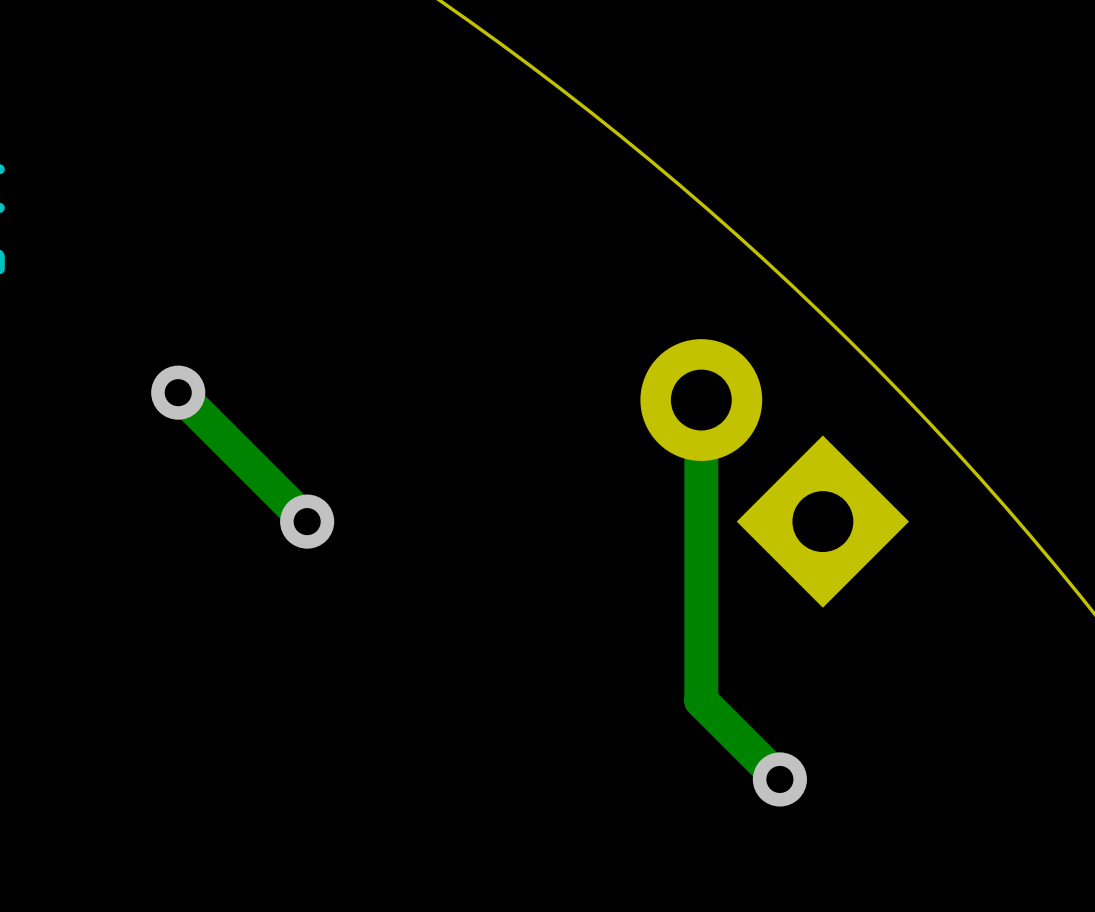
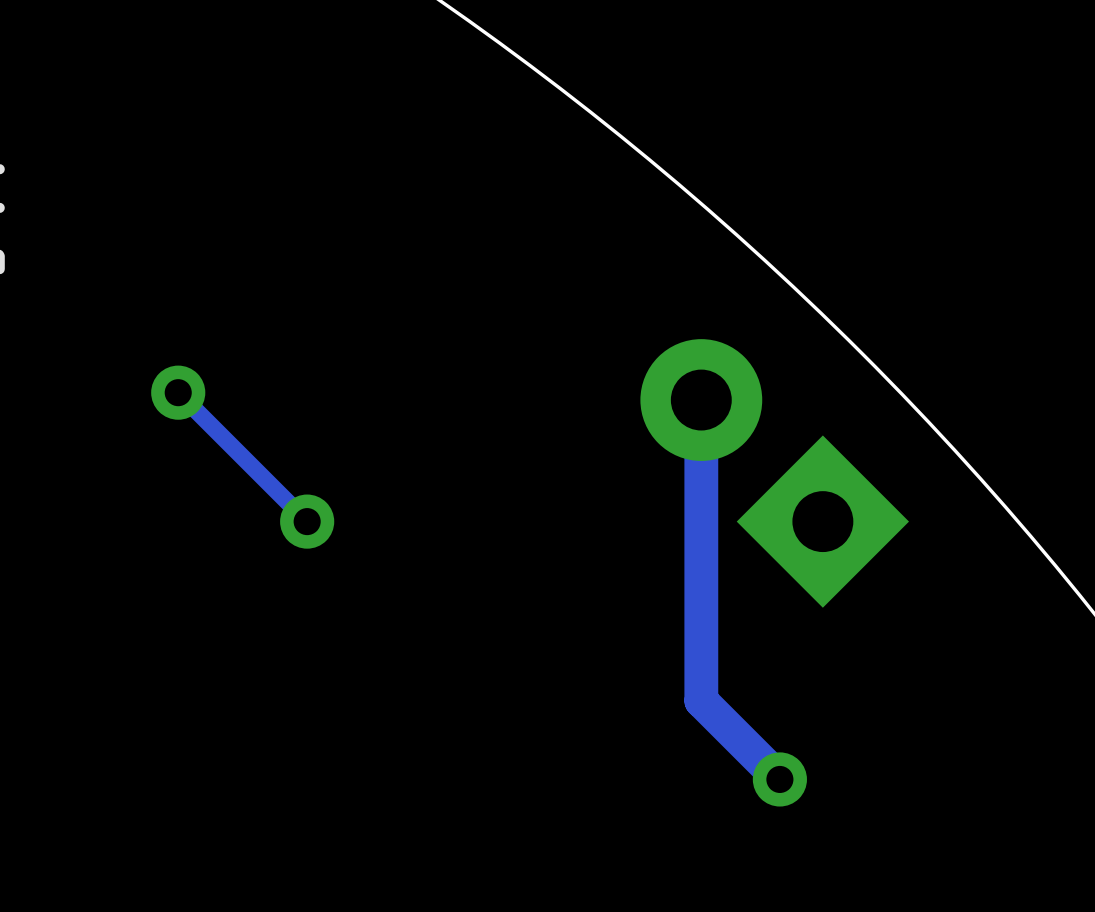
track width: thick (178, 392) (307, 521) -> thin (178, 392) (307, 521)

